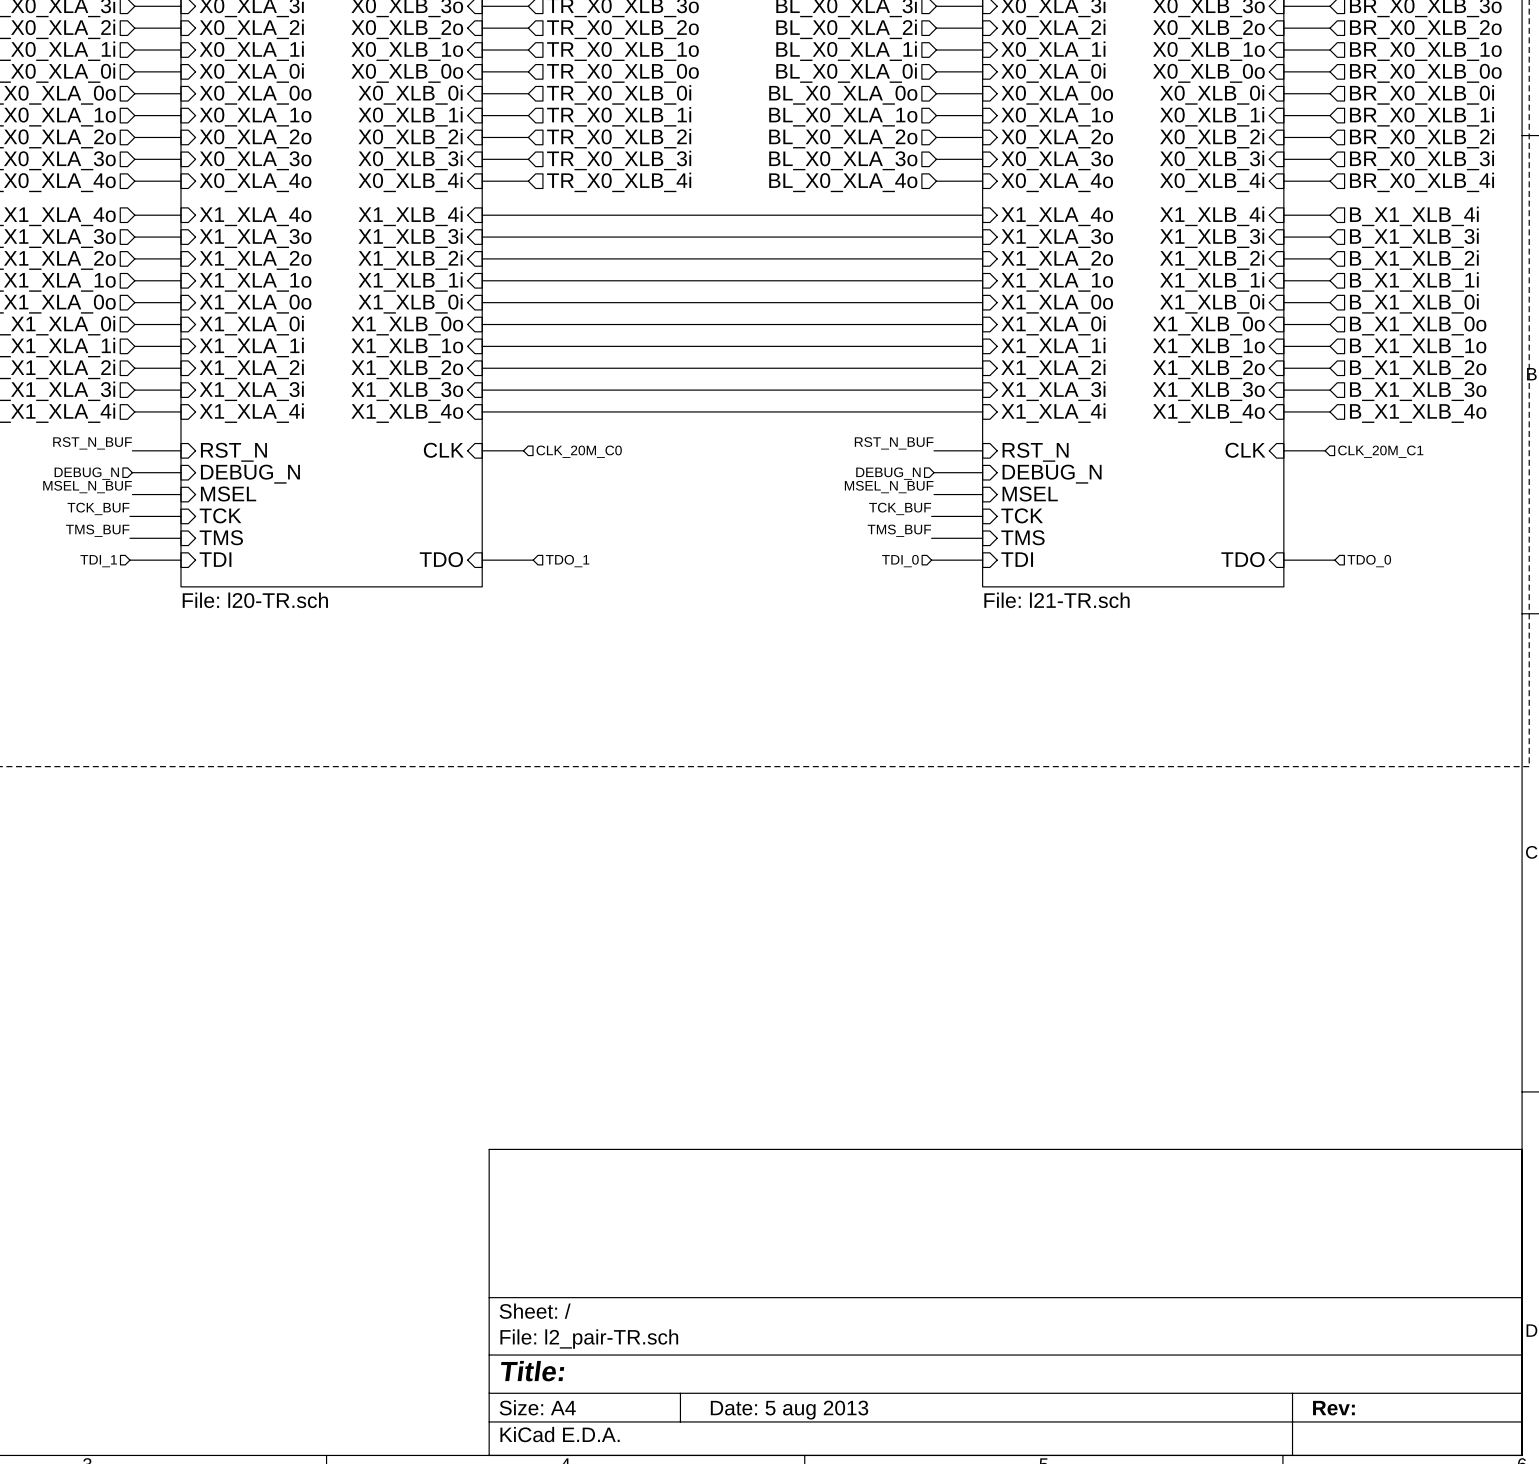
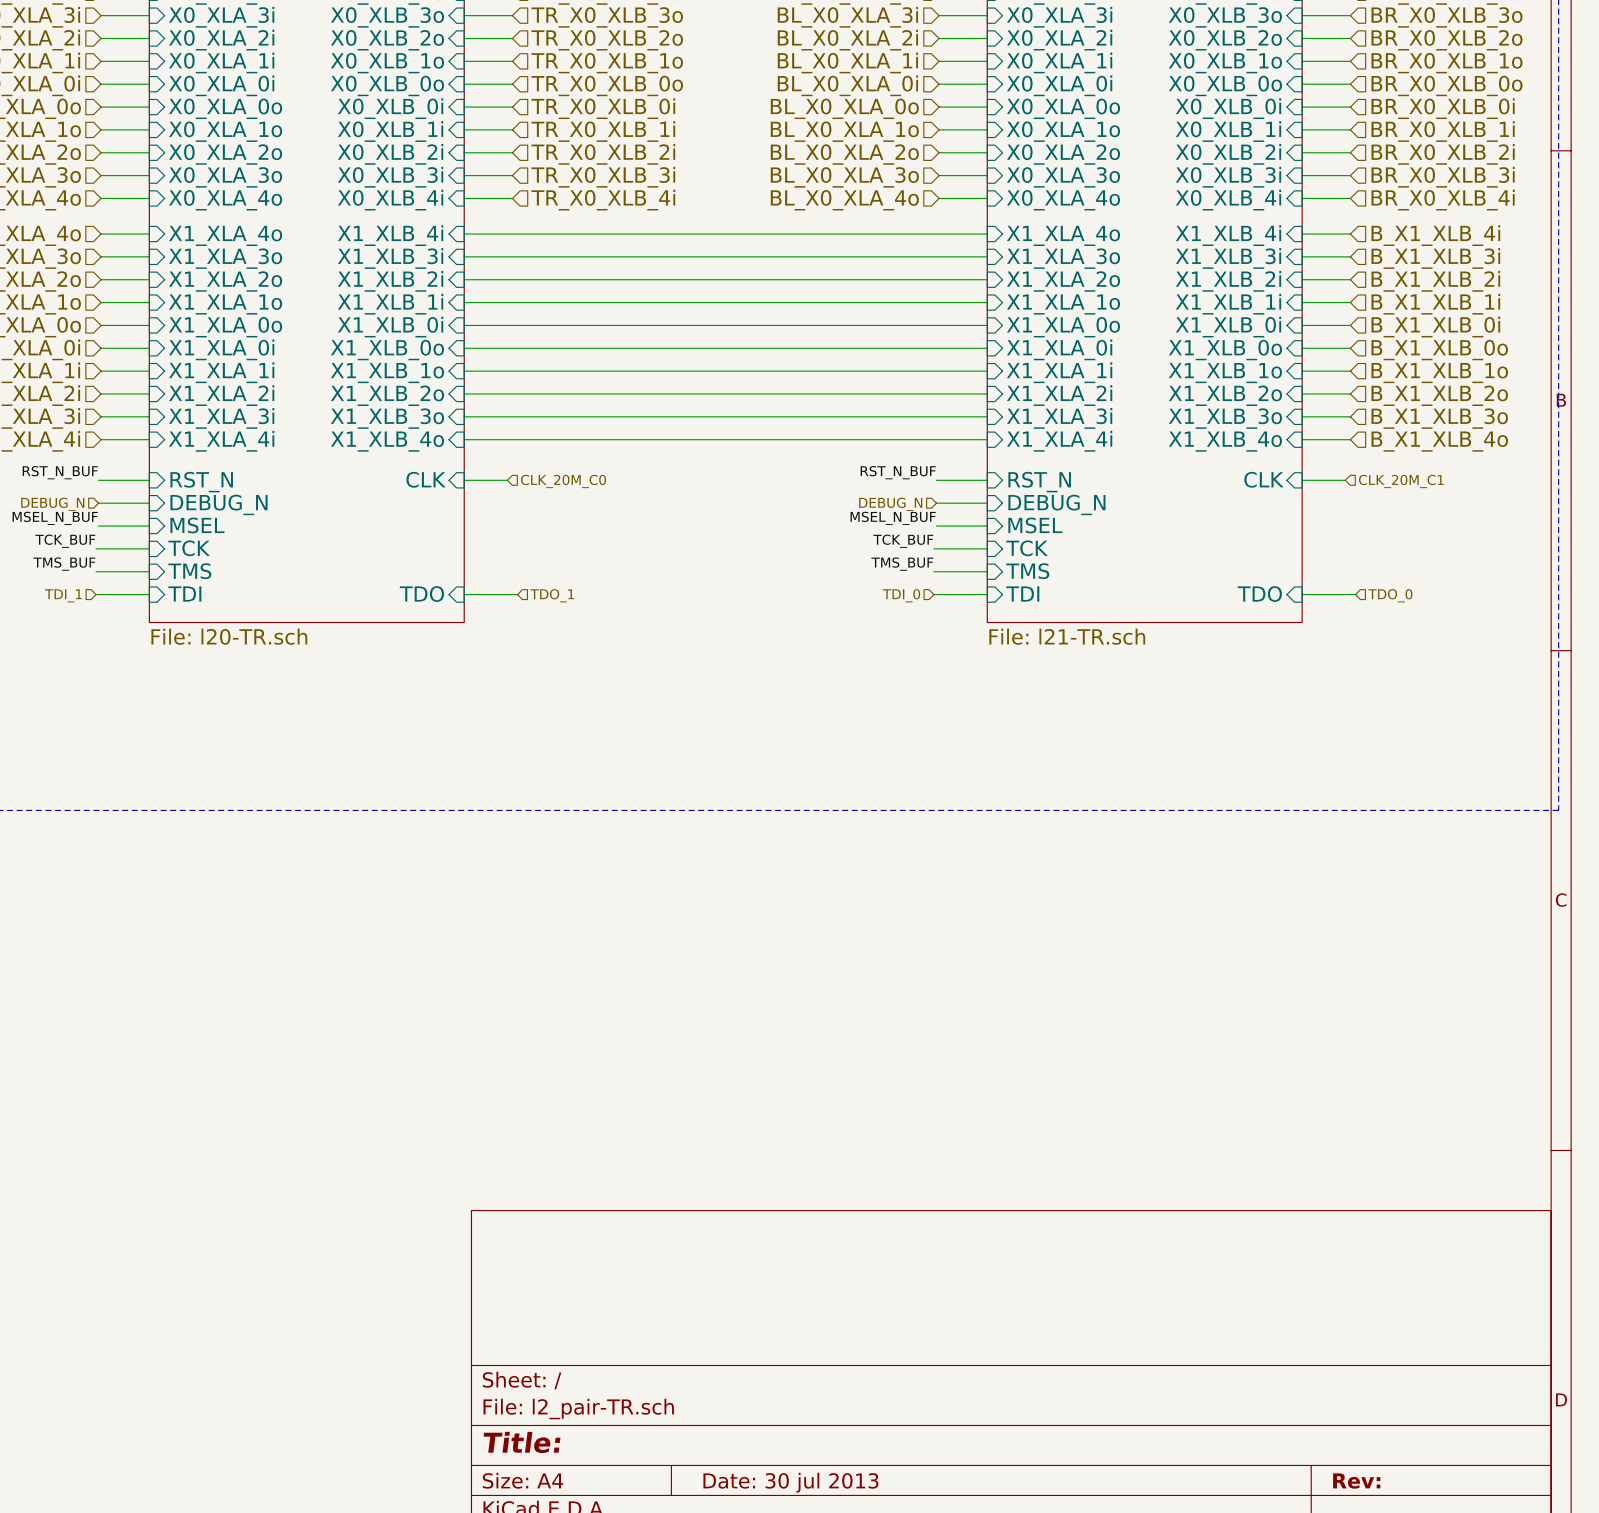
title block: Date: 5 aug 2013 (789, 1410) -> Date: 30 jul 2013 (790, 1482)

